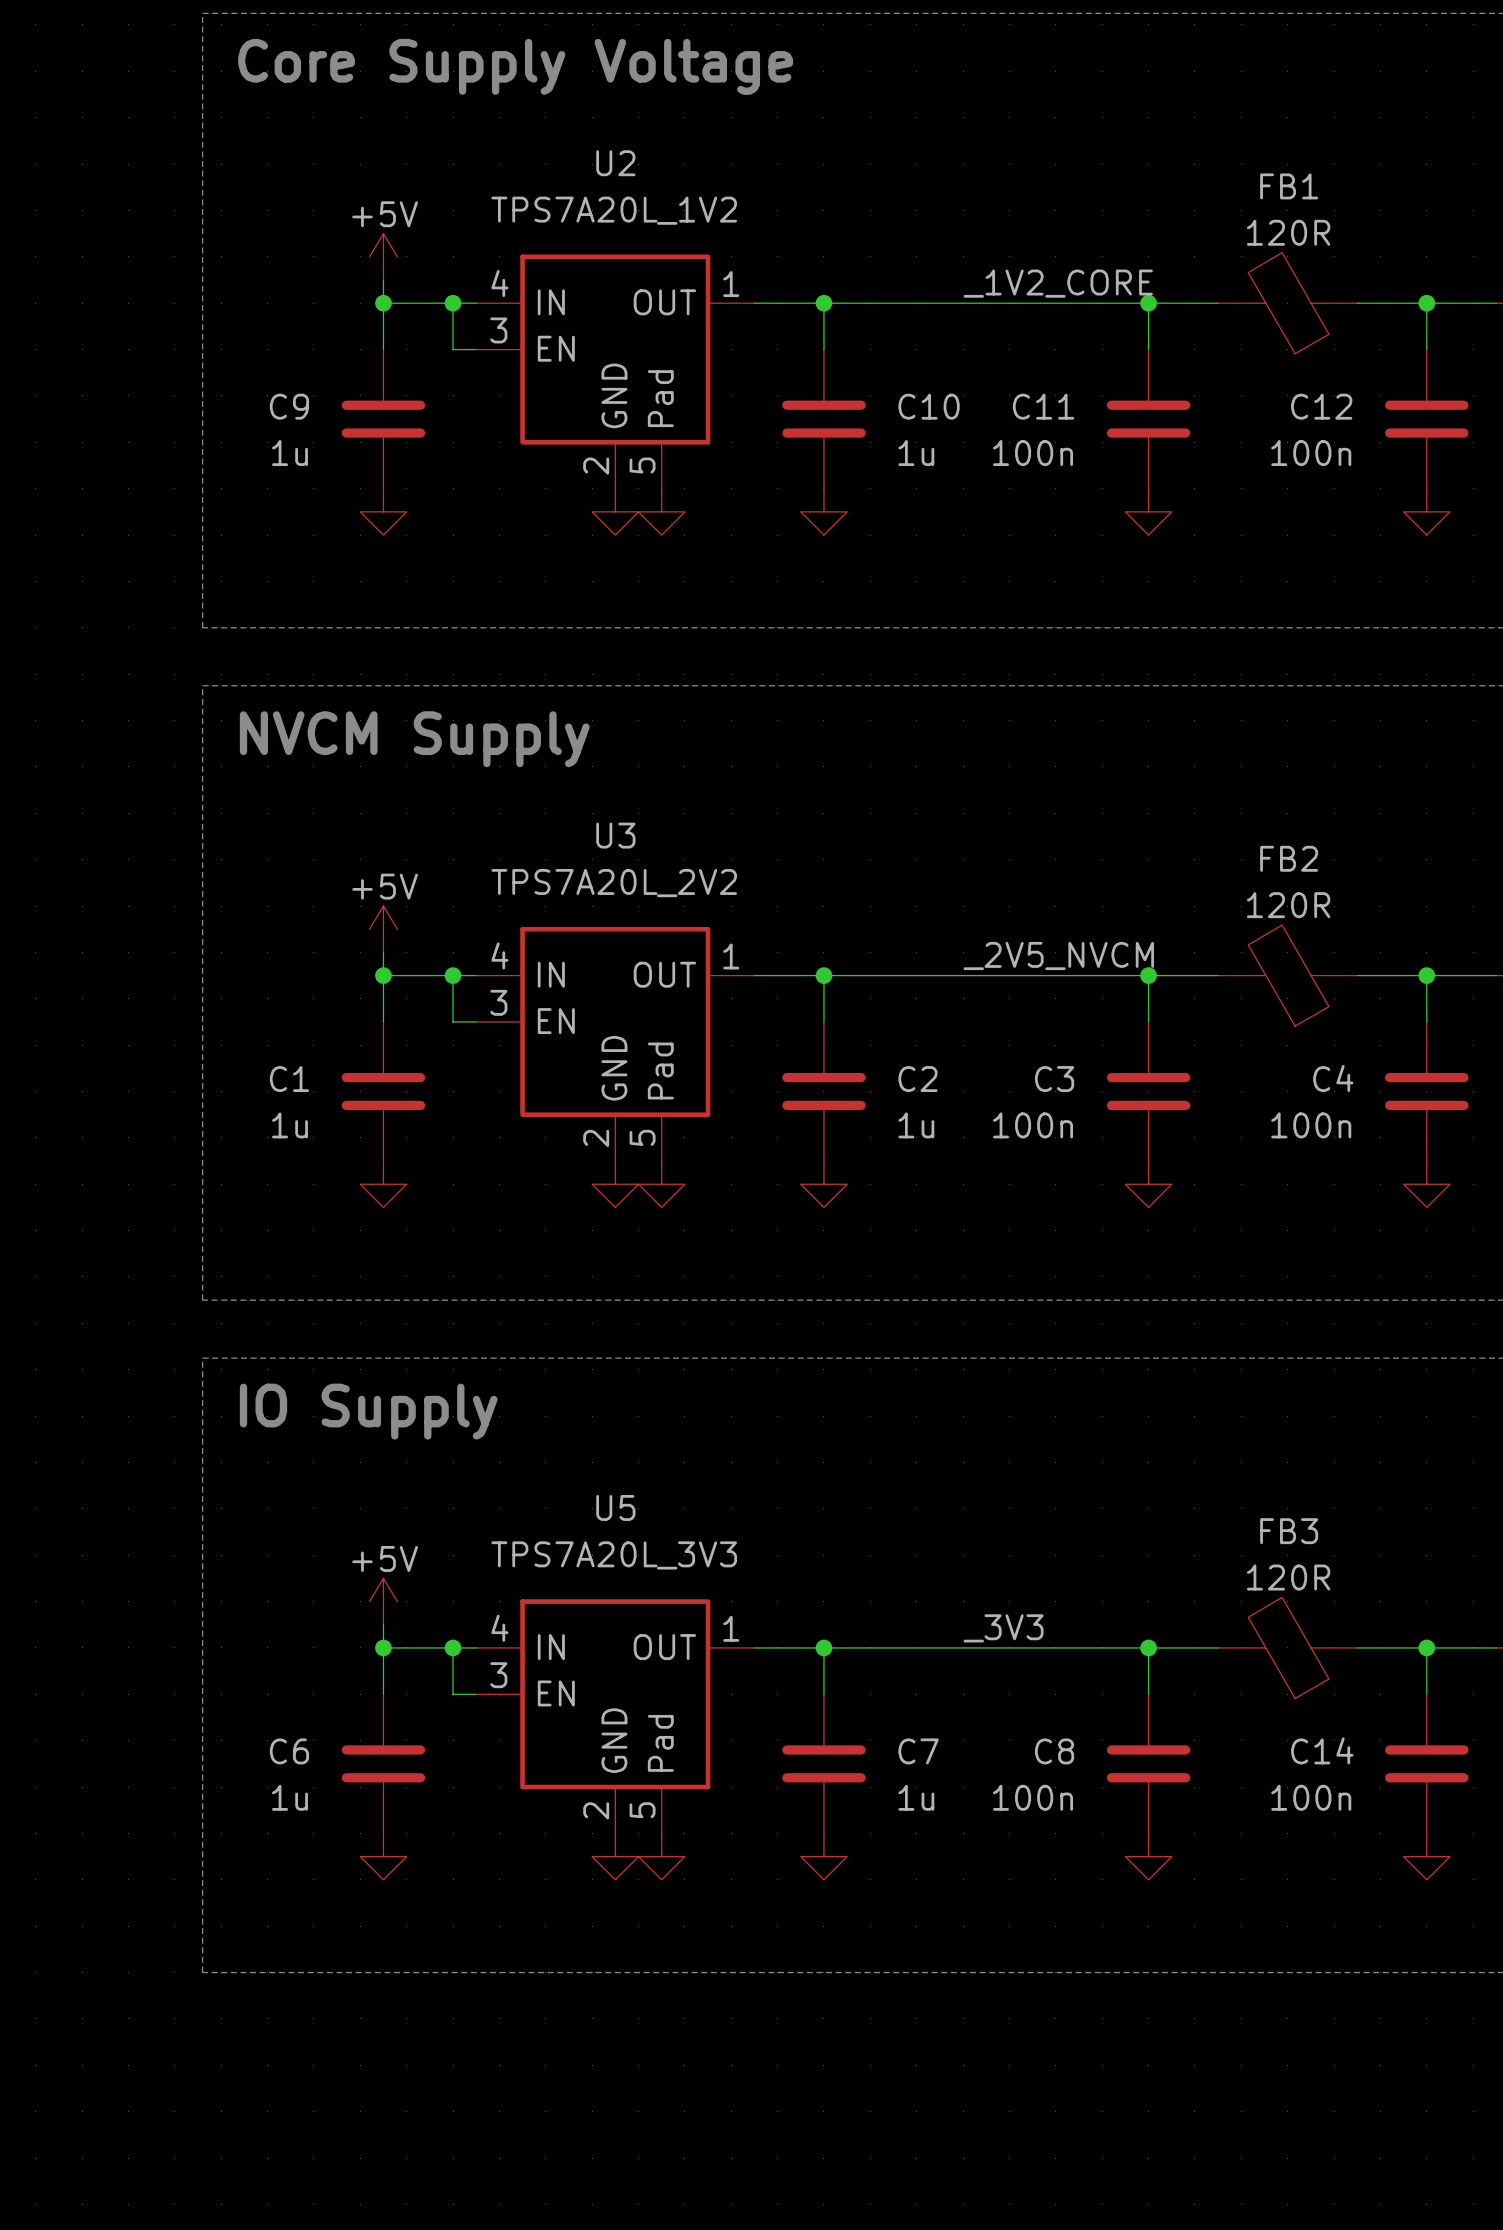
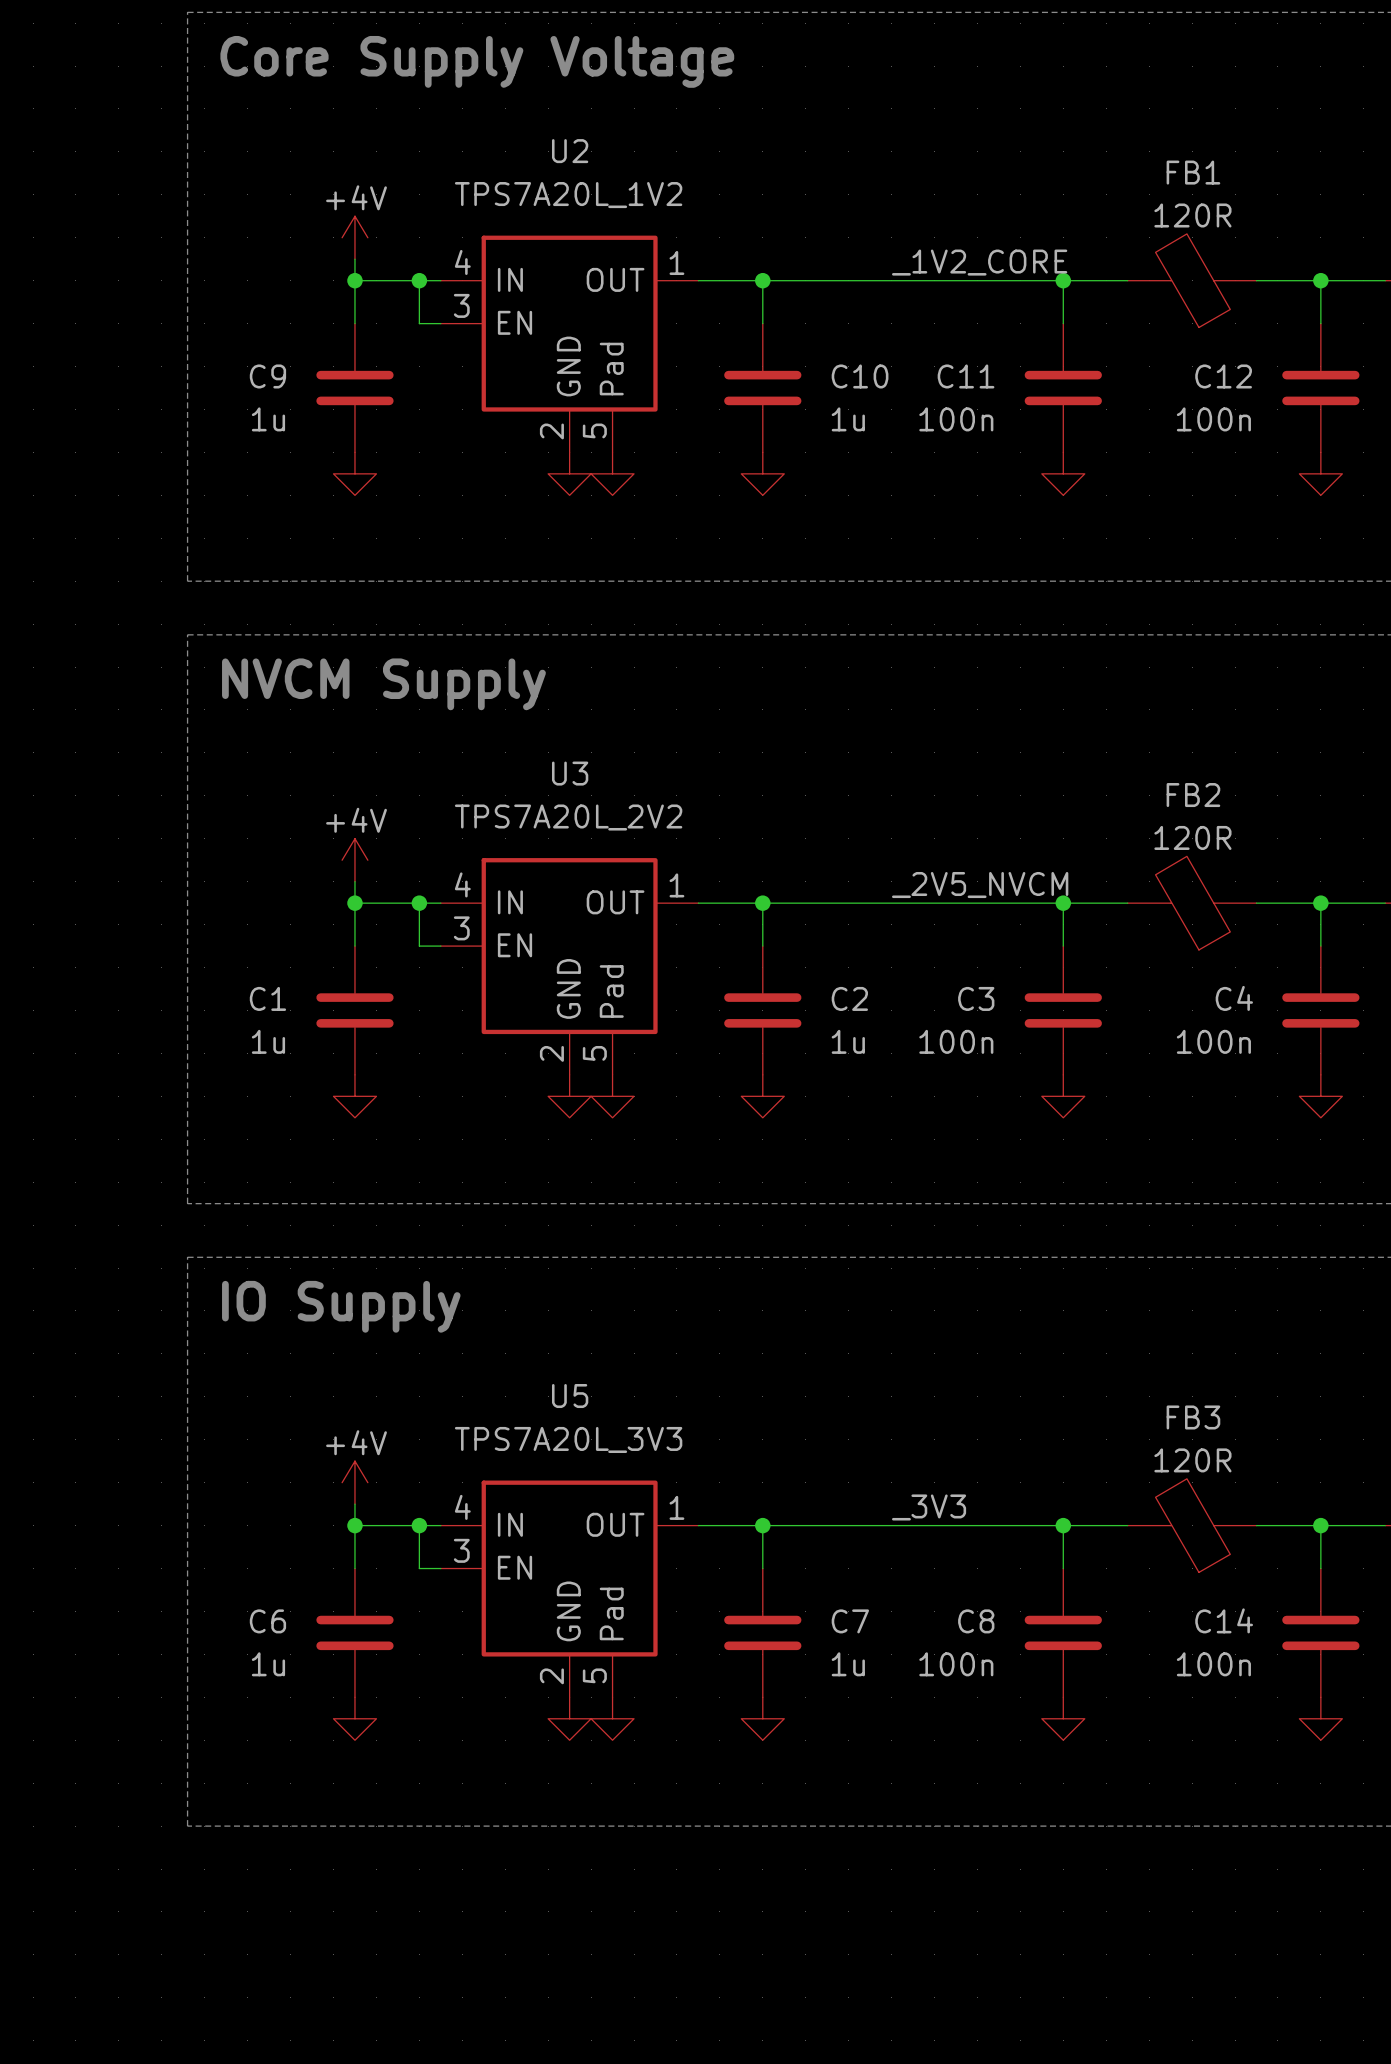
power symbol: +5V (383, 256) -> +4V (354, 237)
power symbol: +5V (383, 929) -> +4V (354, 860)
power symbol: +5V (383, 1601) -> +4V (354, 1482)

